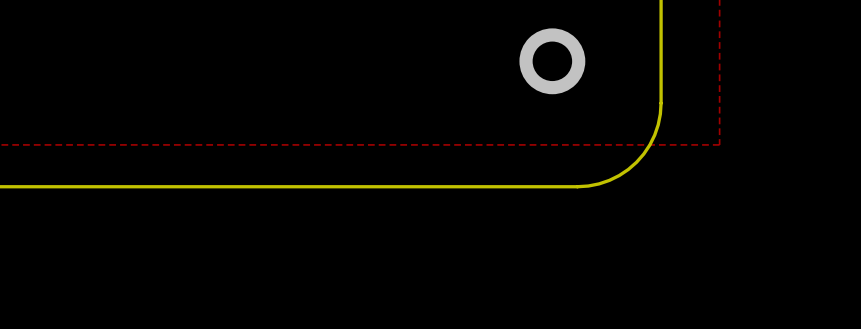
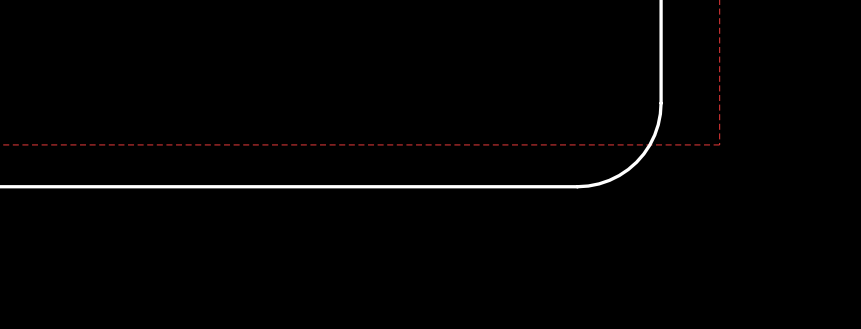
via: (552, 61) -> none

